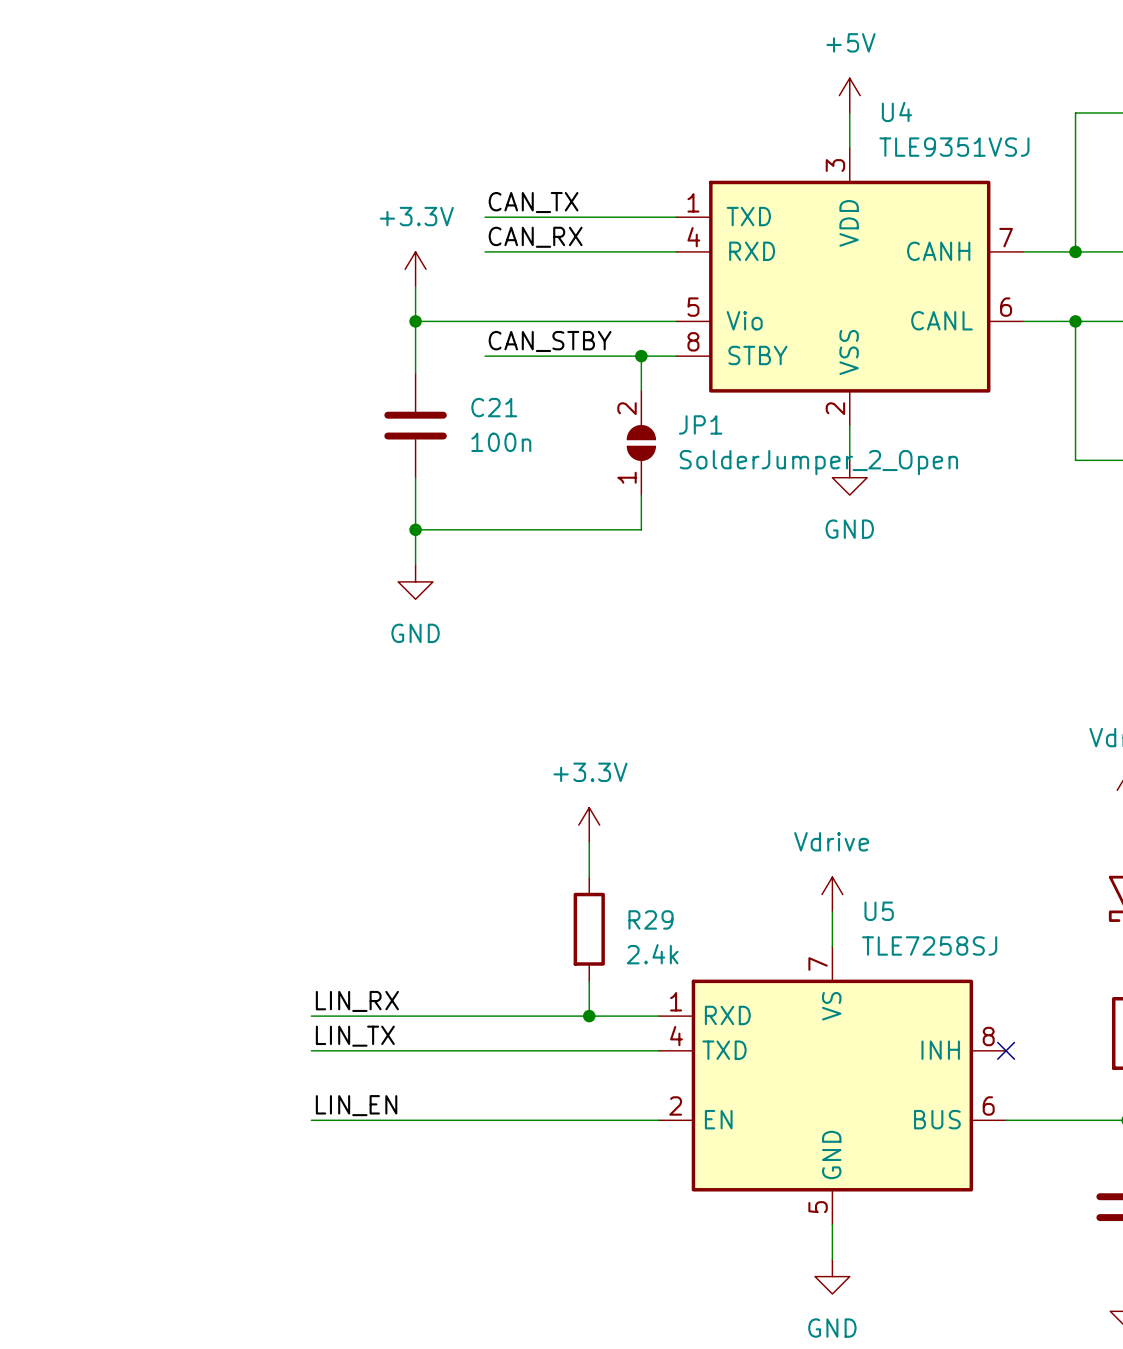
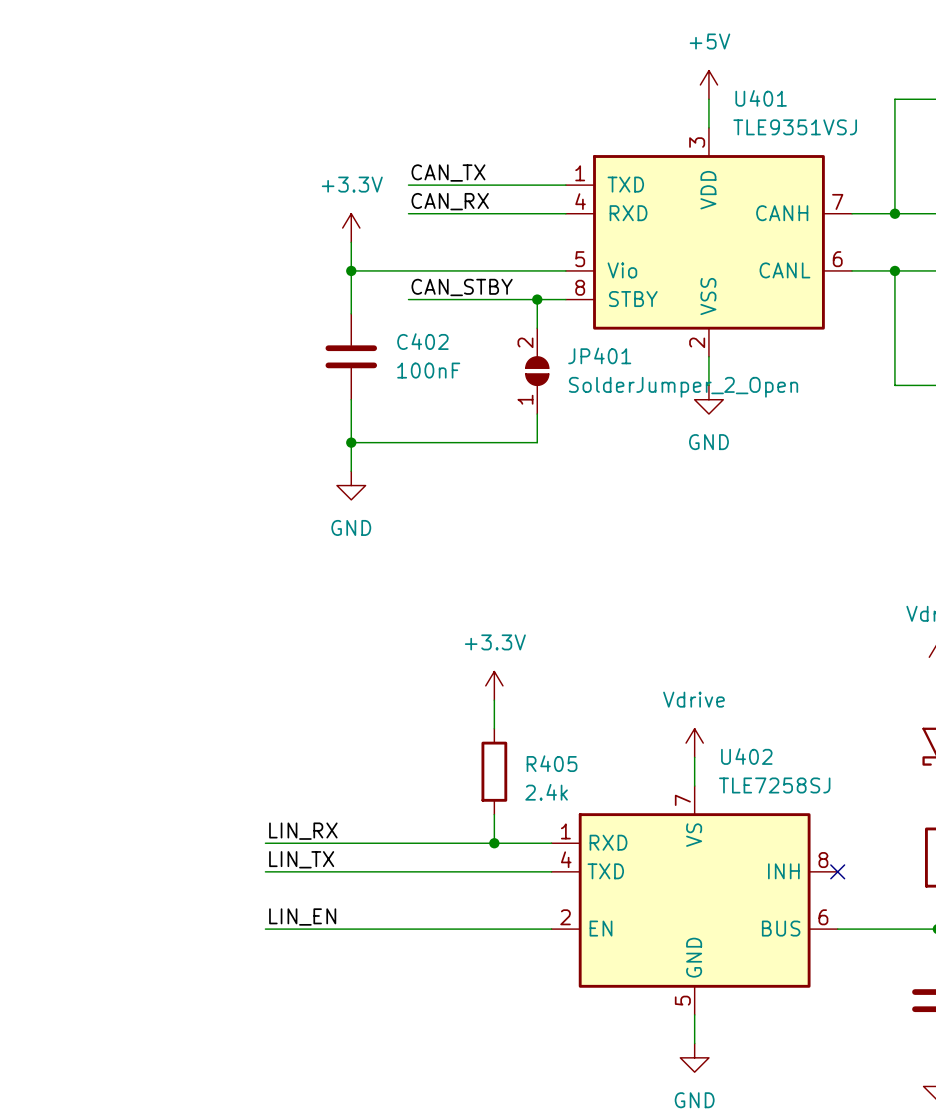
U4 name: U4 (896, 111) -> U401 (761, 98)
C21 name: C21 (494, 407) -> C402 (422, 341)
JP1 name: JP1 (700, 424) -> JP401 (599, 355)
C21 value: 100n (501, 442) -> 100nF (428, 370)
U5 name: U5 (879, 911) -> U402 (746, 756)
R29 name: R29 (650, 919) -> R405 (552, 763)

